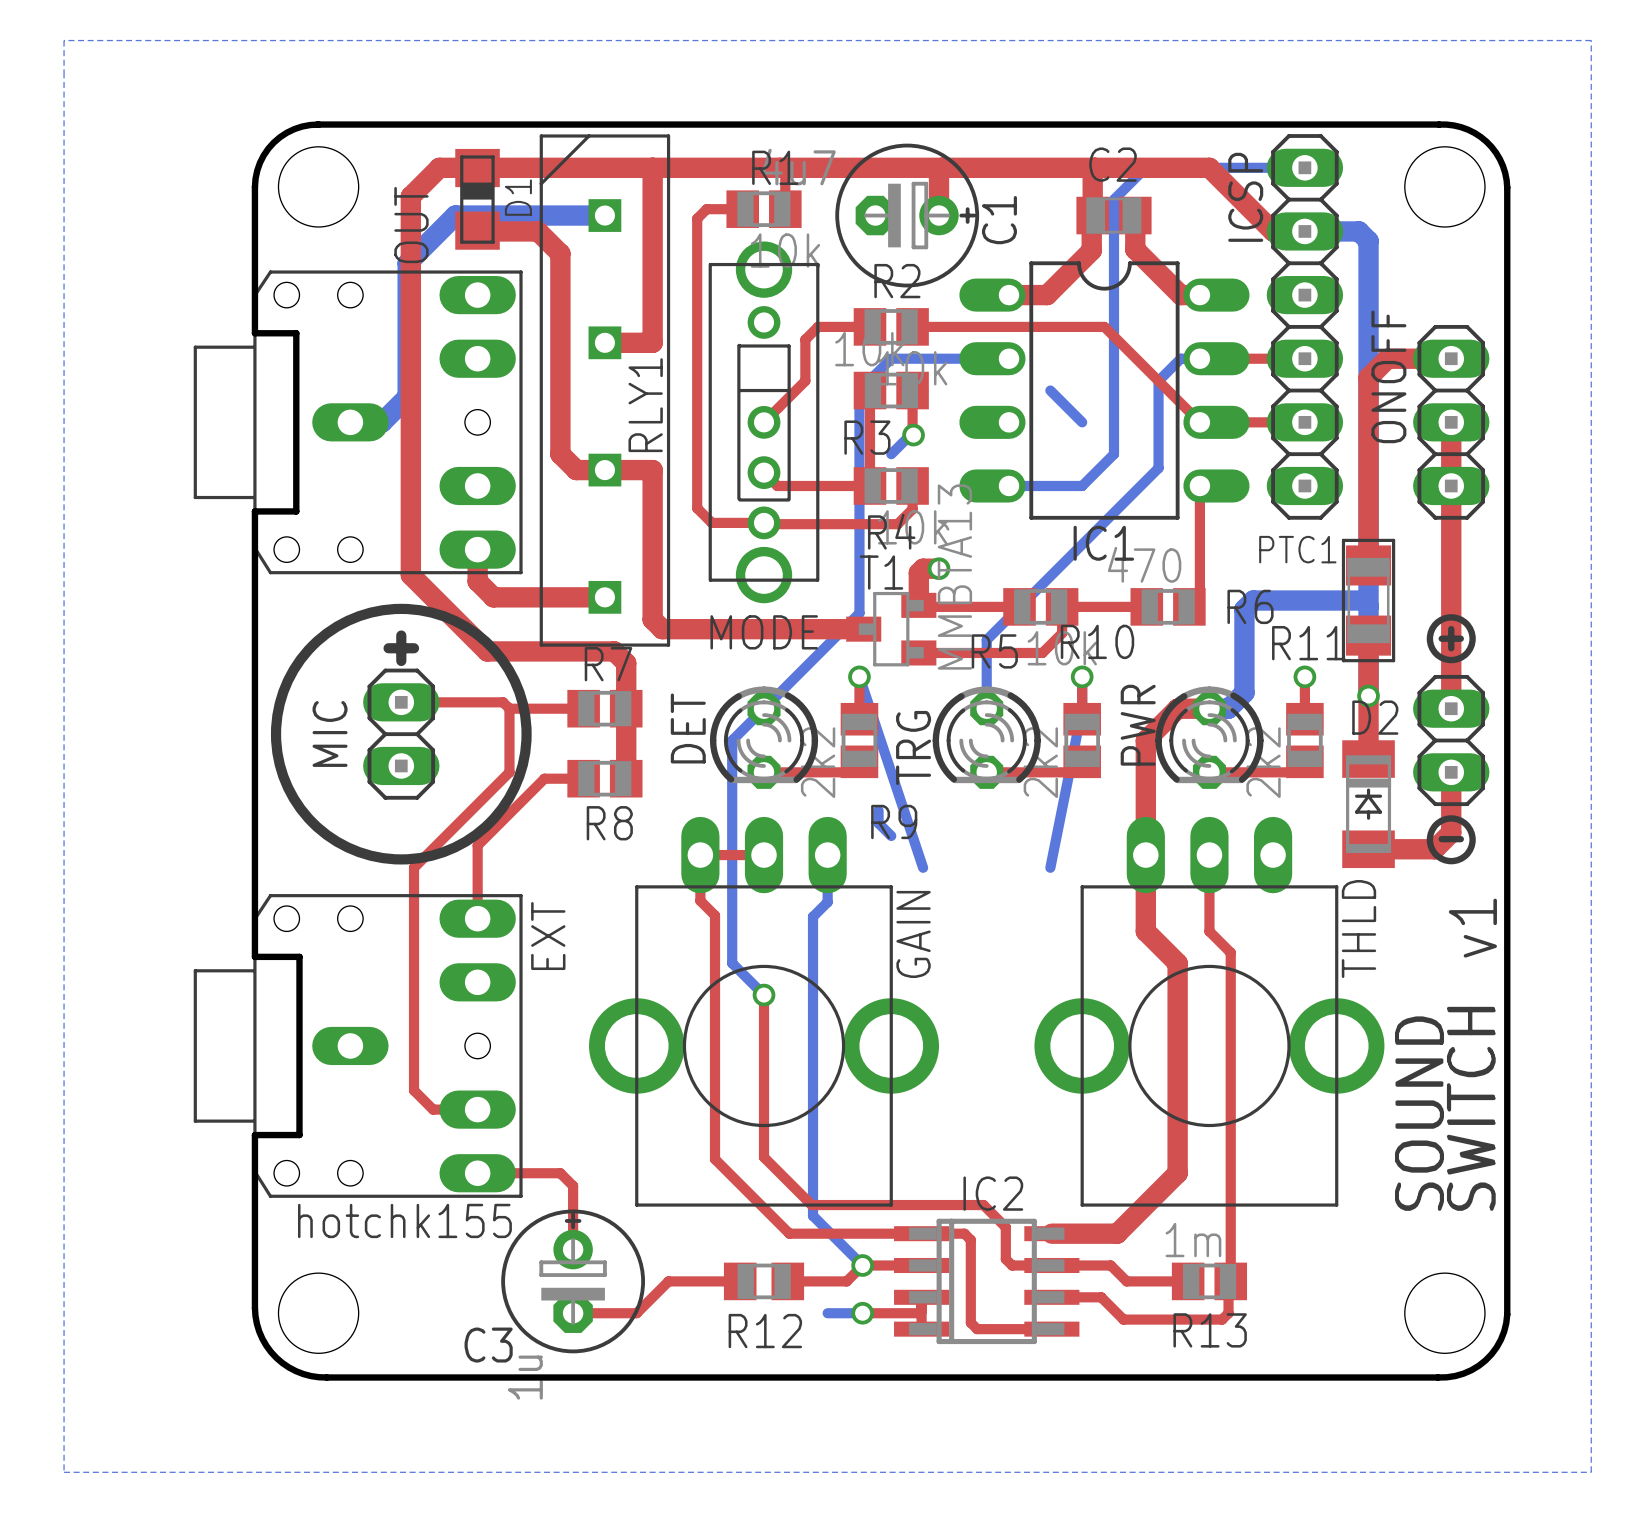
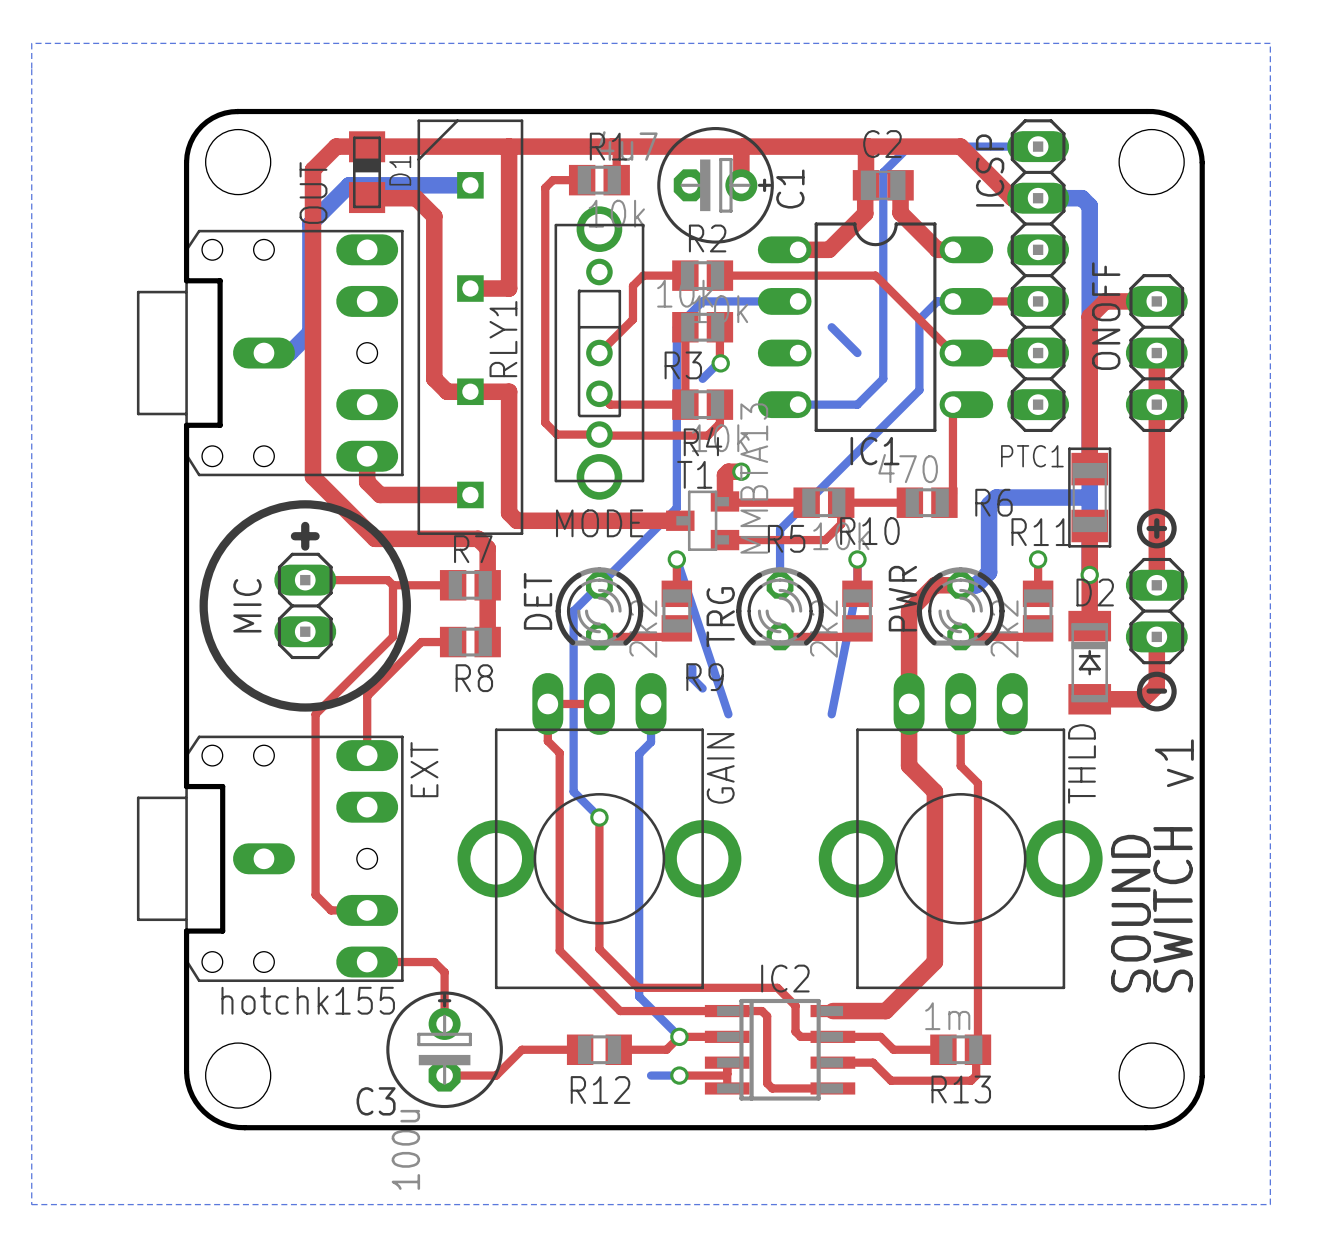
C3 value: 1u (525, 1377) -> 100u (405, 1149)

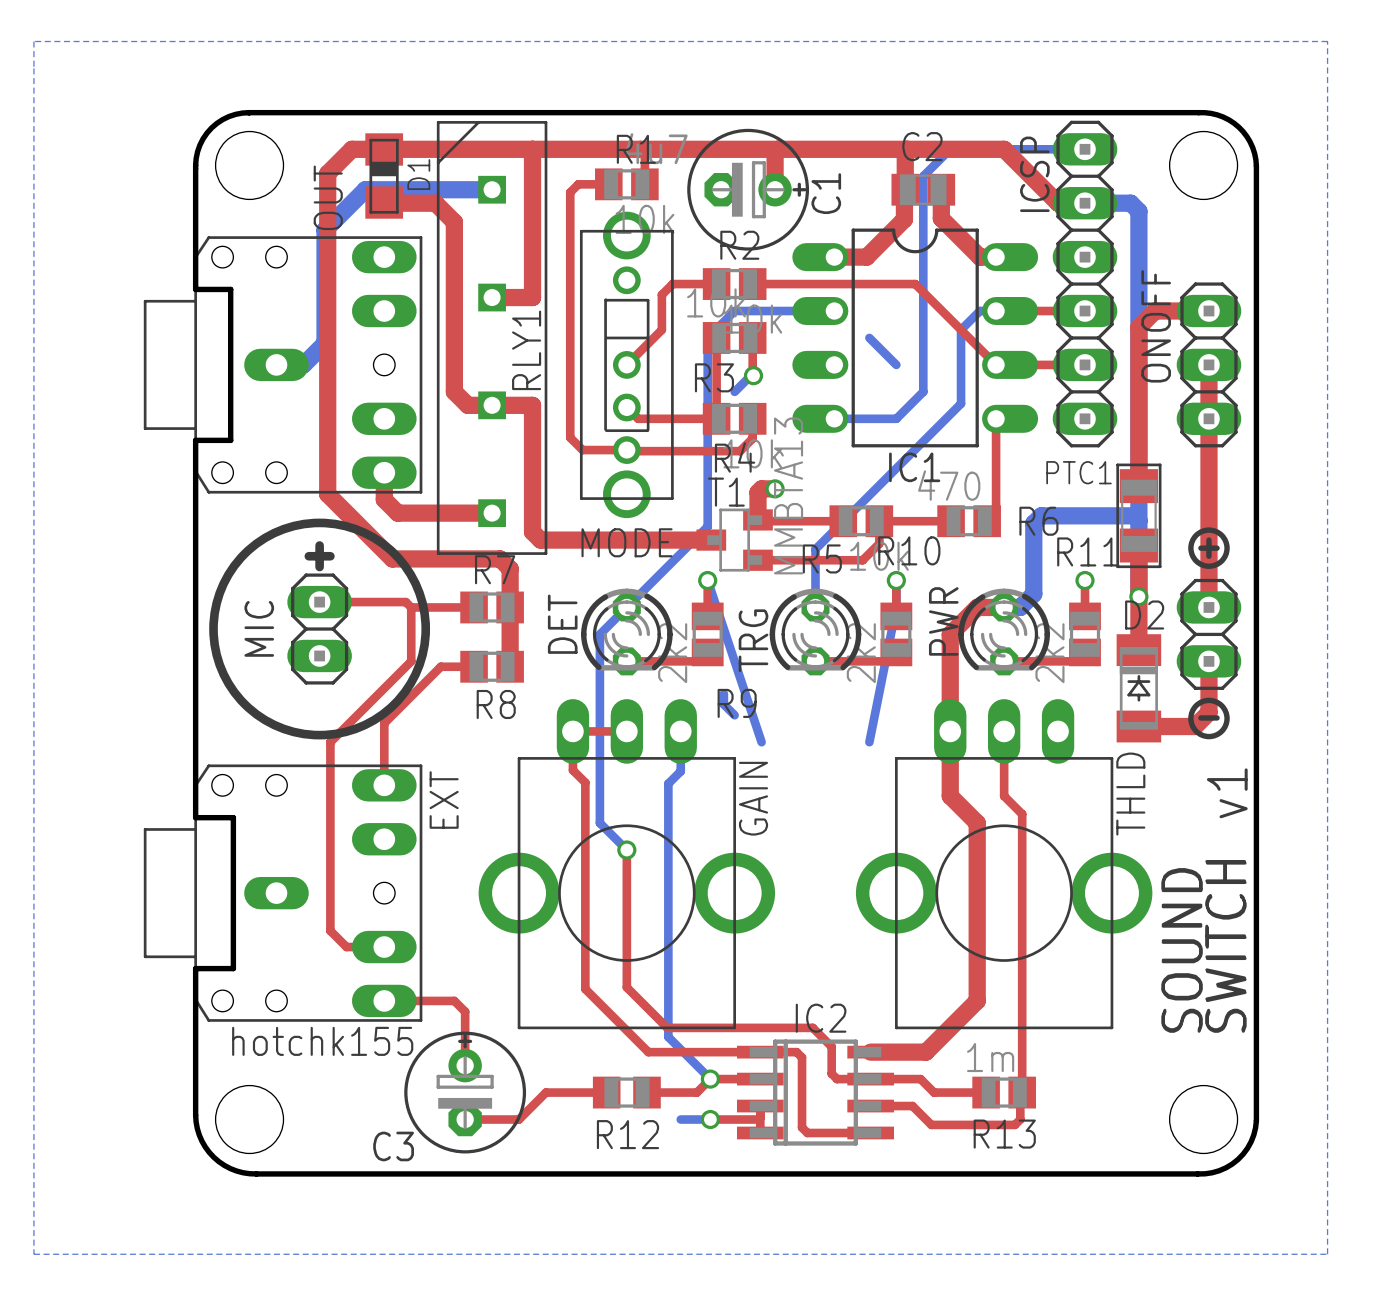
C3 value: 100u (405, 1149) -> none

